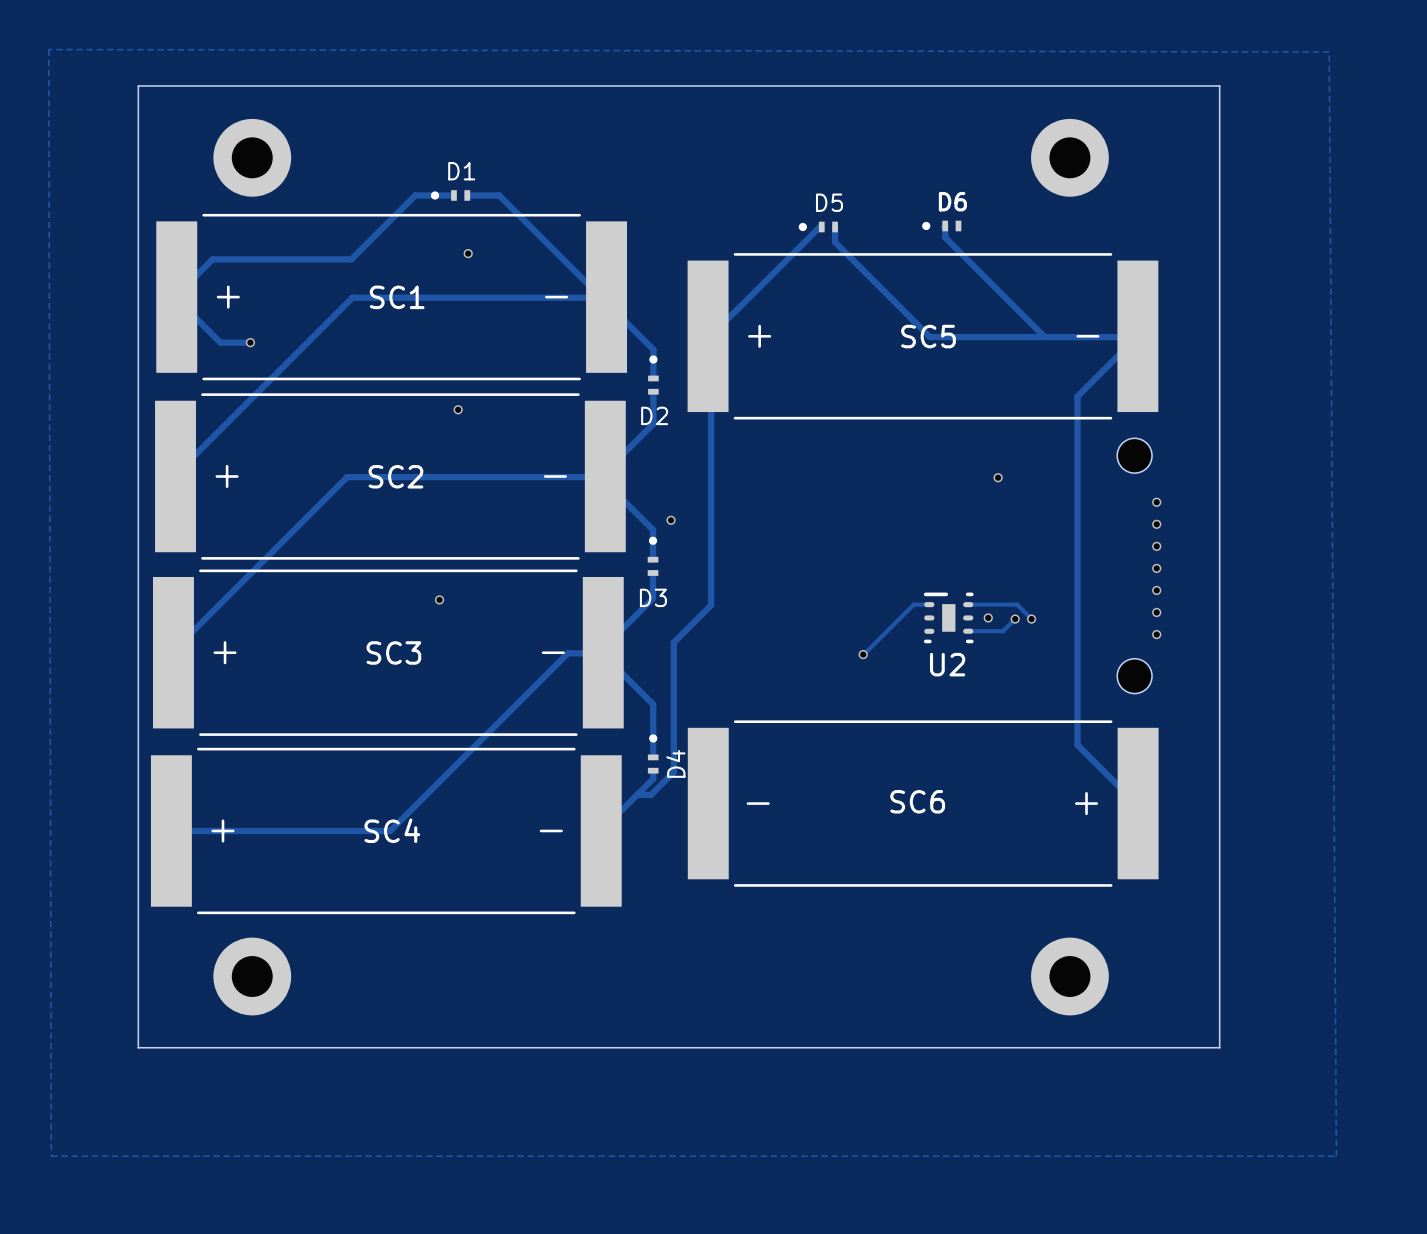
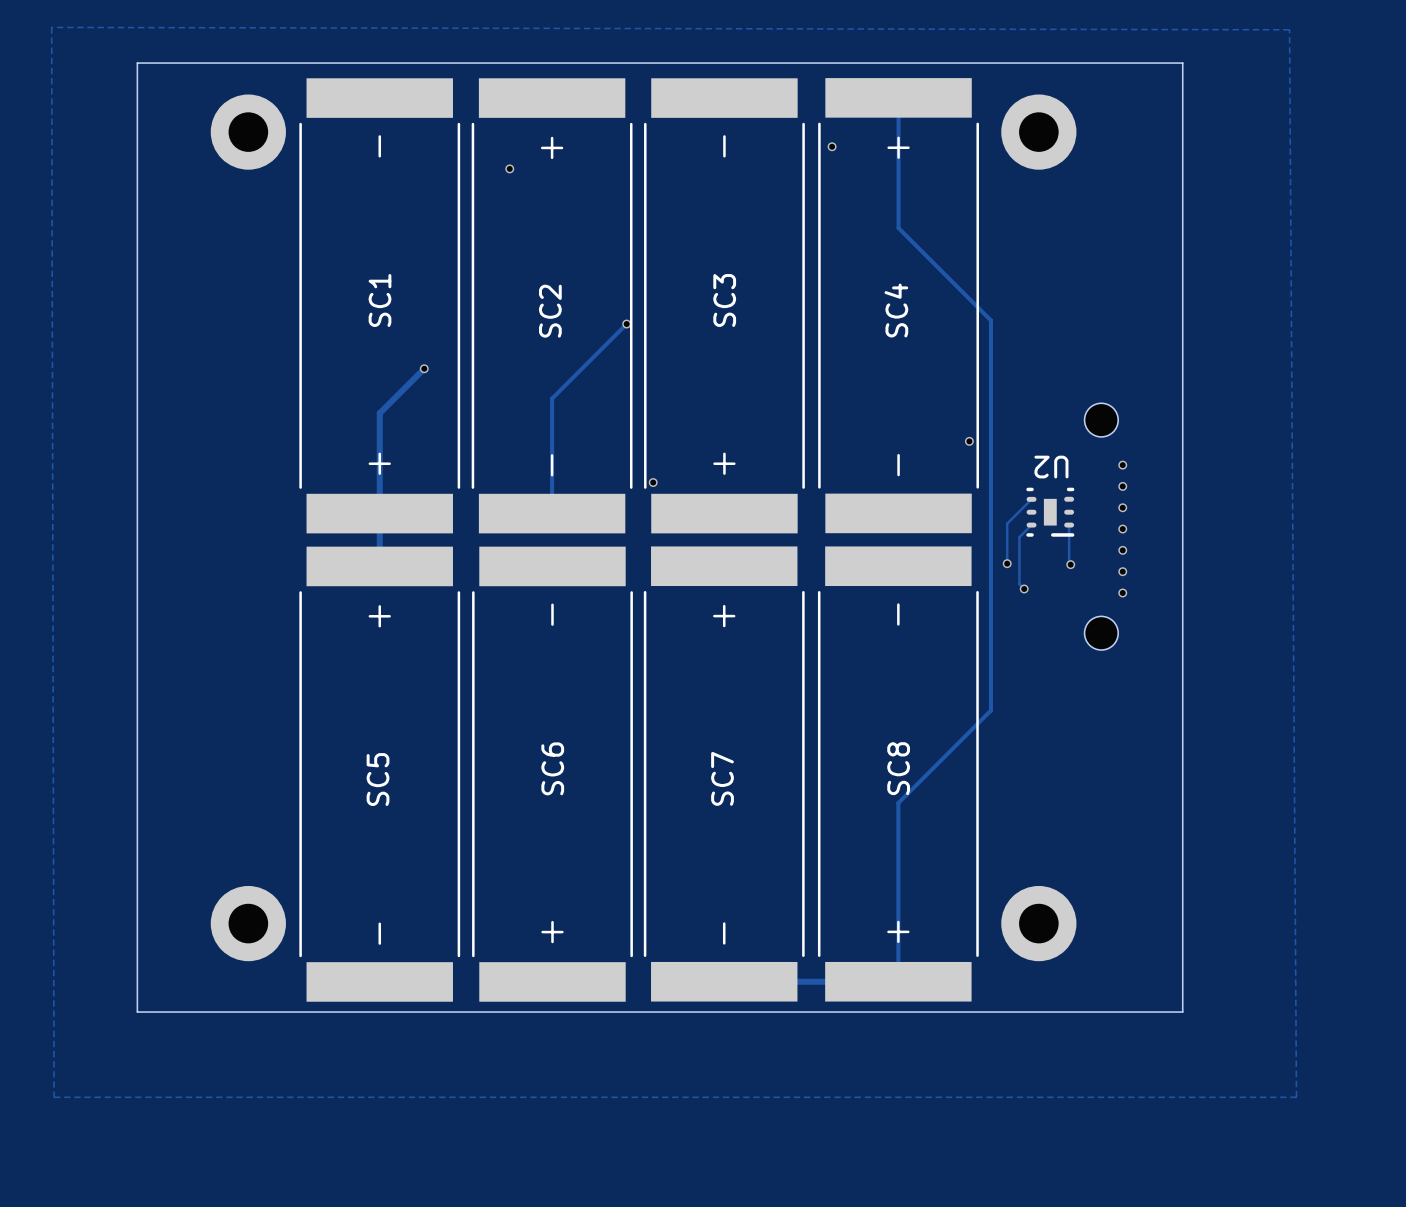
board edge: (138, 85) (1219, 85) (1219, 1047) (138, 1047) (138, 85) -> (137, 63) (137, 1012) (1182, 1012) (1182, 63) (137, 63)
track: none -> (898, 97) (898, 228) (990, 320) (990, 710) (898, 803) (898, 981) (724, 981)
via: none -> (832, 146)
D1: (450, 195) -> none
track: (453, 195) (415, 195) (351, 259) (212, 259) (174, 297) (220, 342) (250, 342) -> none
track: (467, 195) (499, 195) (653, 349) (653, 378) -> none
via: none -> (509, 168)
D6: (941, 225) -> none
D5: (818, 227) -> none
track: (821, 227) (710, 336) (711, 605) (673, 642) (673, 772) (651, 794) (637, 794) -> none
track: (835, 227) (835, 242) (929, 337) (1136, 337) (1077, 396) (1077, 745) (1135, 803) -> none
track: (944, 227) (945, 237) (1044, 337) -> none
via: (468, 253) -> none
SC1 rotation: 0° (391, 297) -> 90° counterclockwise (379, 305)
track: (601, 297) (352, 297) (173, 476) -> none
SC5 rotation: 0° (922, 336) -> 90° clockwise (379, 774)
SC5 position: (922, 336) -> (379, 774)
via: (250, 342) -> none
track: none -> (626, 324) (552, 398) (552, 513)
via: none -> (626, 324)
D2: (653, 375) -> none
track: (653, 391) (653, 423) (600, 477) -> none
track: none -> (424, 368) (379, 413) (379, 566)
via position: (458, 409) -> (424, 368)
SC2 rotation: 0° (390, 476) -> 90° clockwise (552, 305)
track: (600, 477) (347, 477) (171, 652) -> none
track: (600, 477) (653, 529) (653, 559) -> none
track: none -> (1031, 499) (1007, 523) (1007, 563)
D3: (653, 556) -> none
track: none -> (1031, 525) (1019, 537) (1019, 584) (1024, 588)
track: none -> (1069, 525) (1069, 563) (1070, 564)
track: (653, 573) (653, 598) (598, 653) (567, 653) (390, 830) (171, 830) -> none
via: (439, 599) -> none
track: (913, 604) (863, 654) -> none
track: (968, 604) (1017, 604) (1031, 619) -> none
via: none -> (1007, 563)
via: none -> (1070, 564)
U2 rotation: 0° (948, 617) -> 180° (1050, 512)
U2 position: (948, 617) -> (1050, 512)
via: (988, 617) -> none
track: (1015, 619) (1003, 631) (968, 631) -> none
via: (1015, 619) -> none
via: (1031, 619) -> none
via: none -> (1024, 588)
SC3 rotation: 0° (388, 652) -> 90° counterclockwise (724, 305)
SC3 position: (388, 652) -> (724, 305)
track: (602, 653) (653, 704) (653, 757) -> none
via: (863, 654) -> none
D4: (653, 753) -> none
track: (653, 770) (653, 778) (600, 831) -> none
SC6 rotation: 0° (923, 803) -> 90° clockwise (552, 774)
SC6 position: (923, 803) -> (552, 774)
SC7: none -> (724, 773)
SC8: none -> (898, 773)
SC4 rotation: 0° (386, 830) -> 90° clockwise (898, 305)
SC4 position: (386, 830) -> (898, 305)

